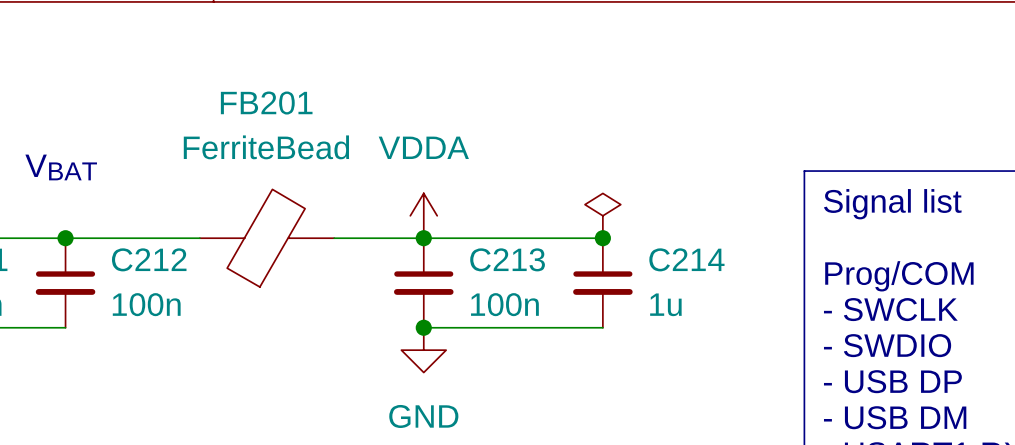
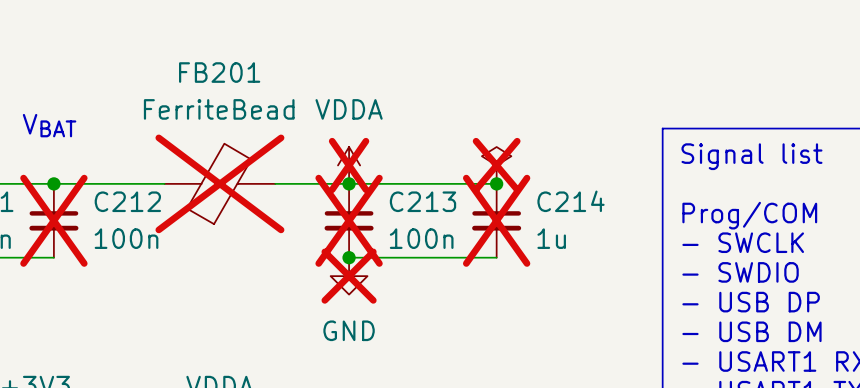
power symbol do-not-place cross: none -> (349, 165)
power symbol do-not-place cross: none -> (496, 165)
FB201 do-not-place cross: none -> (219, 183)
C212 do-not-place cross: none -> (53, 220)
C213 do-not-place cross: none -> (349, 220)
C214 do-not-place cross: none -> (496, 220)
power symbol do-not-place cross: none -> (349, 276)

